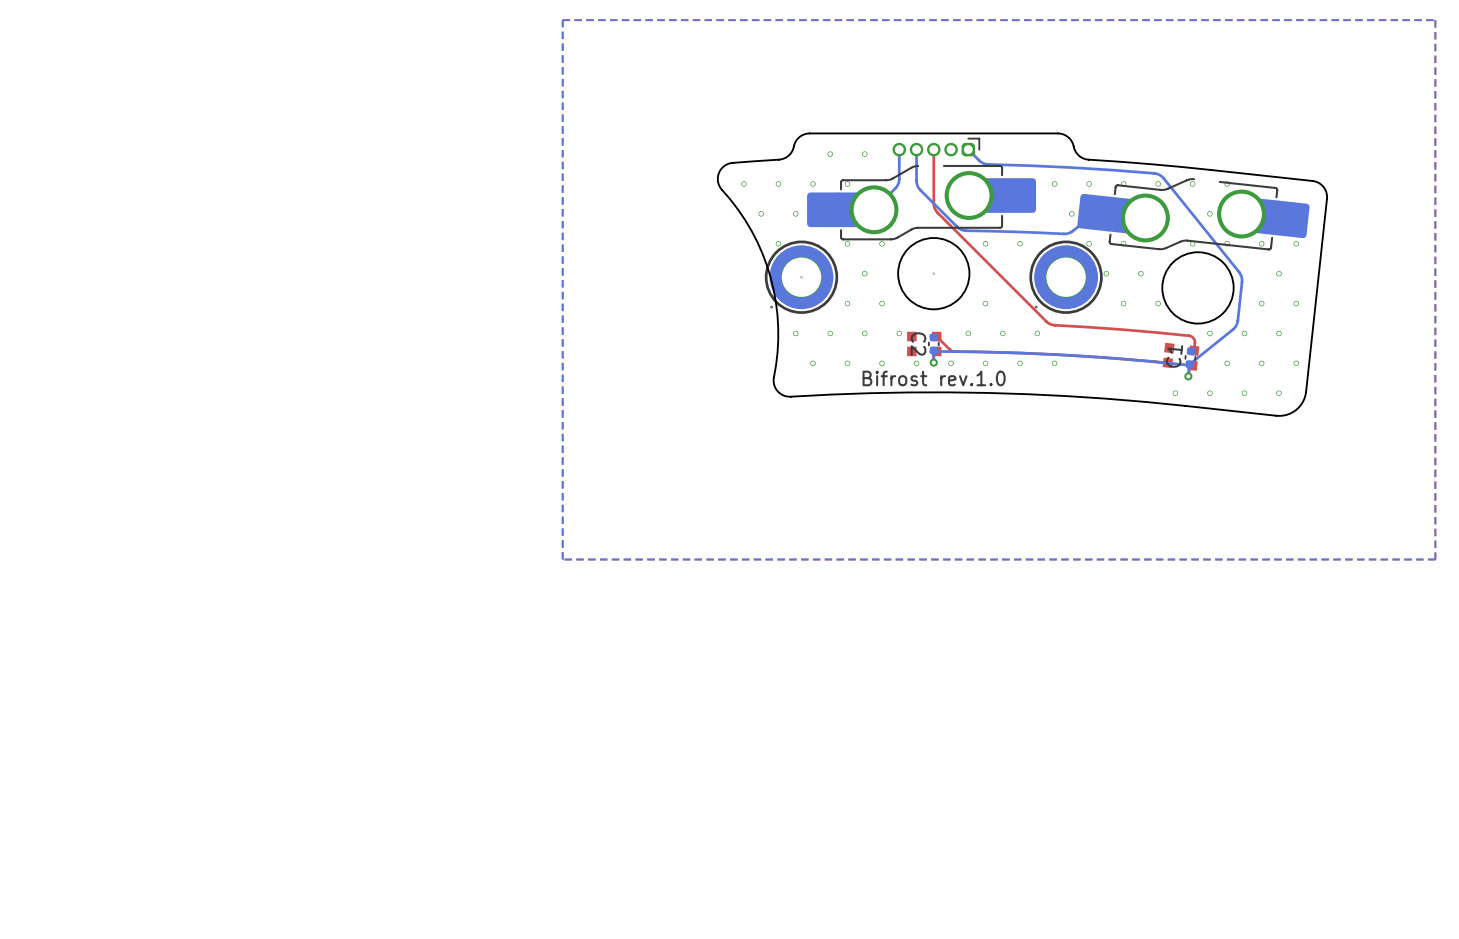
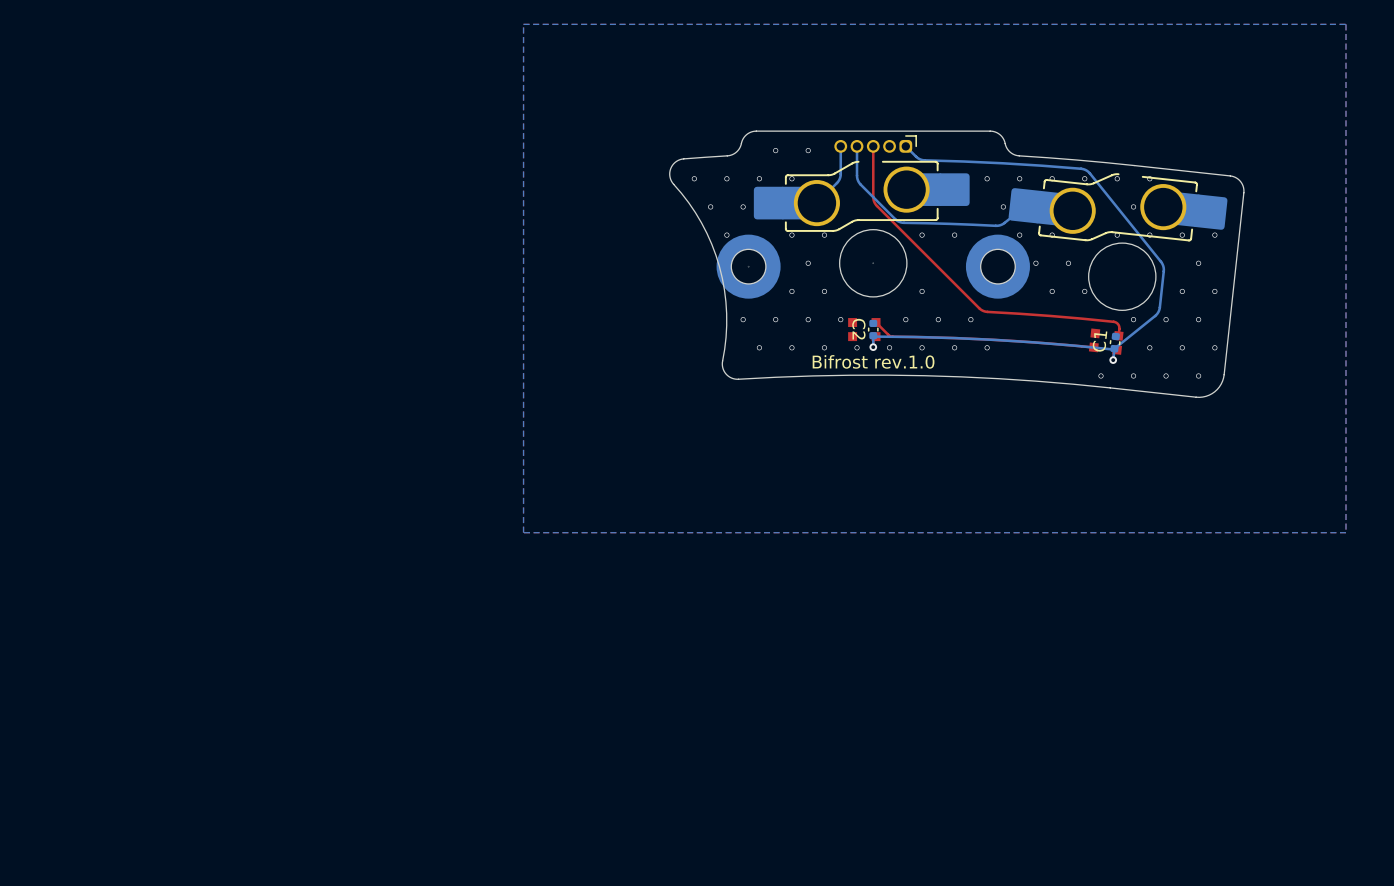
part footprint: [764, 240, 839, 314] -> [716, 234, 781, 299]
part footprint: [1029, 240, 1103, 314] -> [965, 234, 1030, 299]

